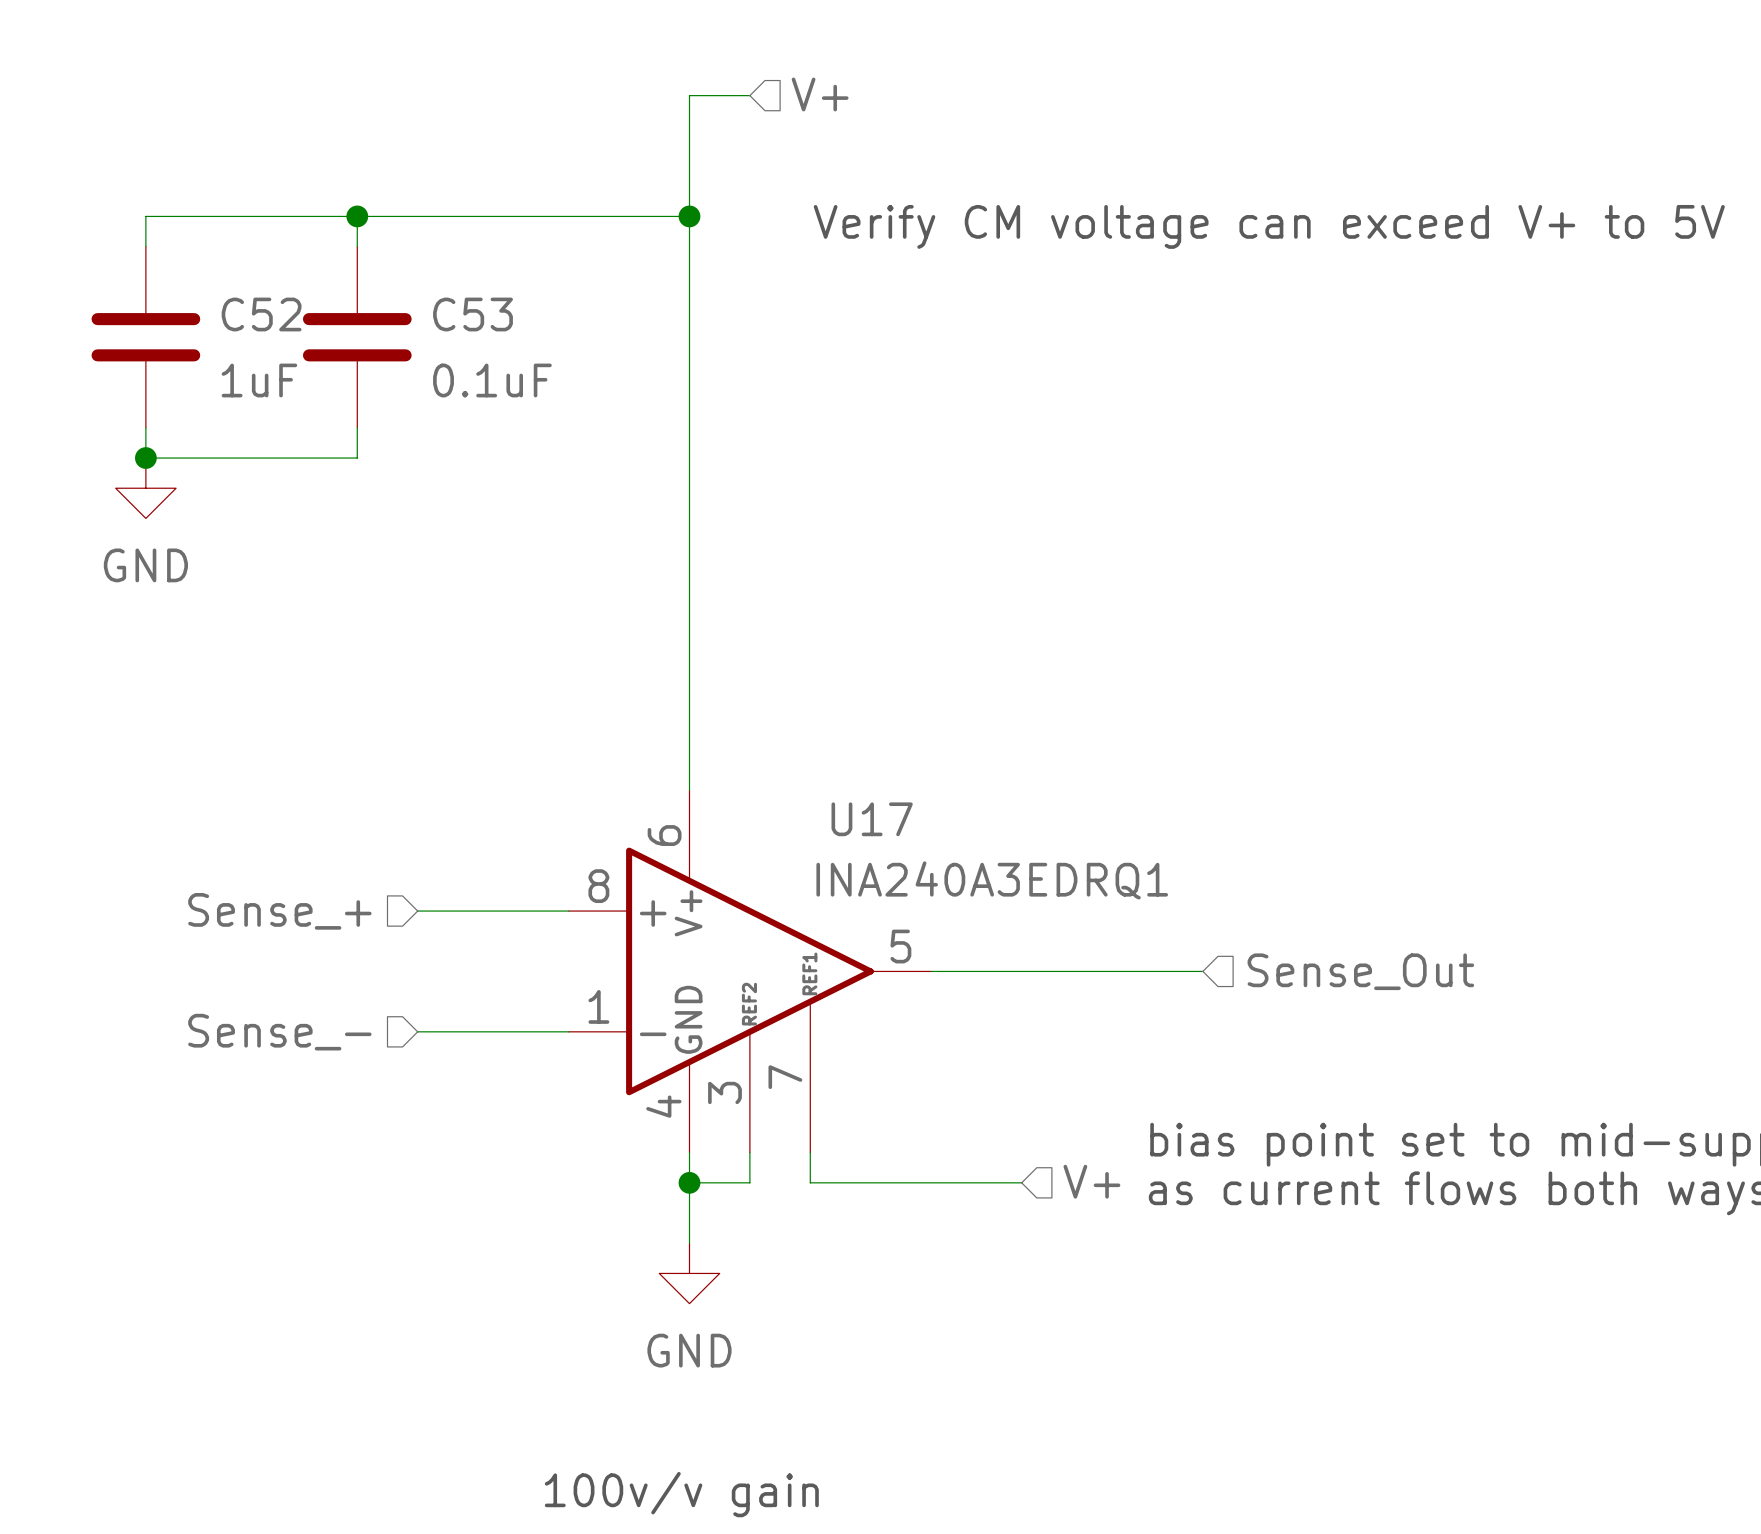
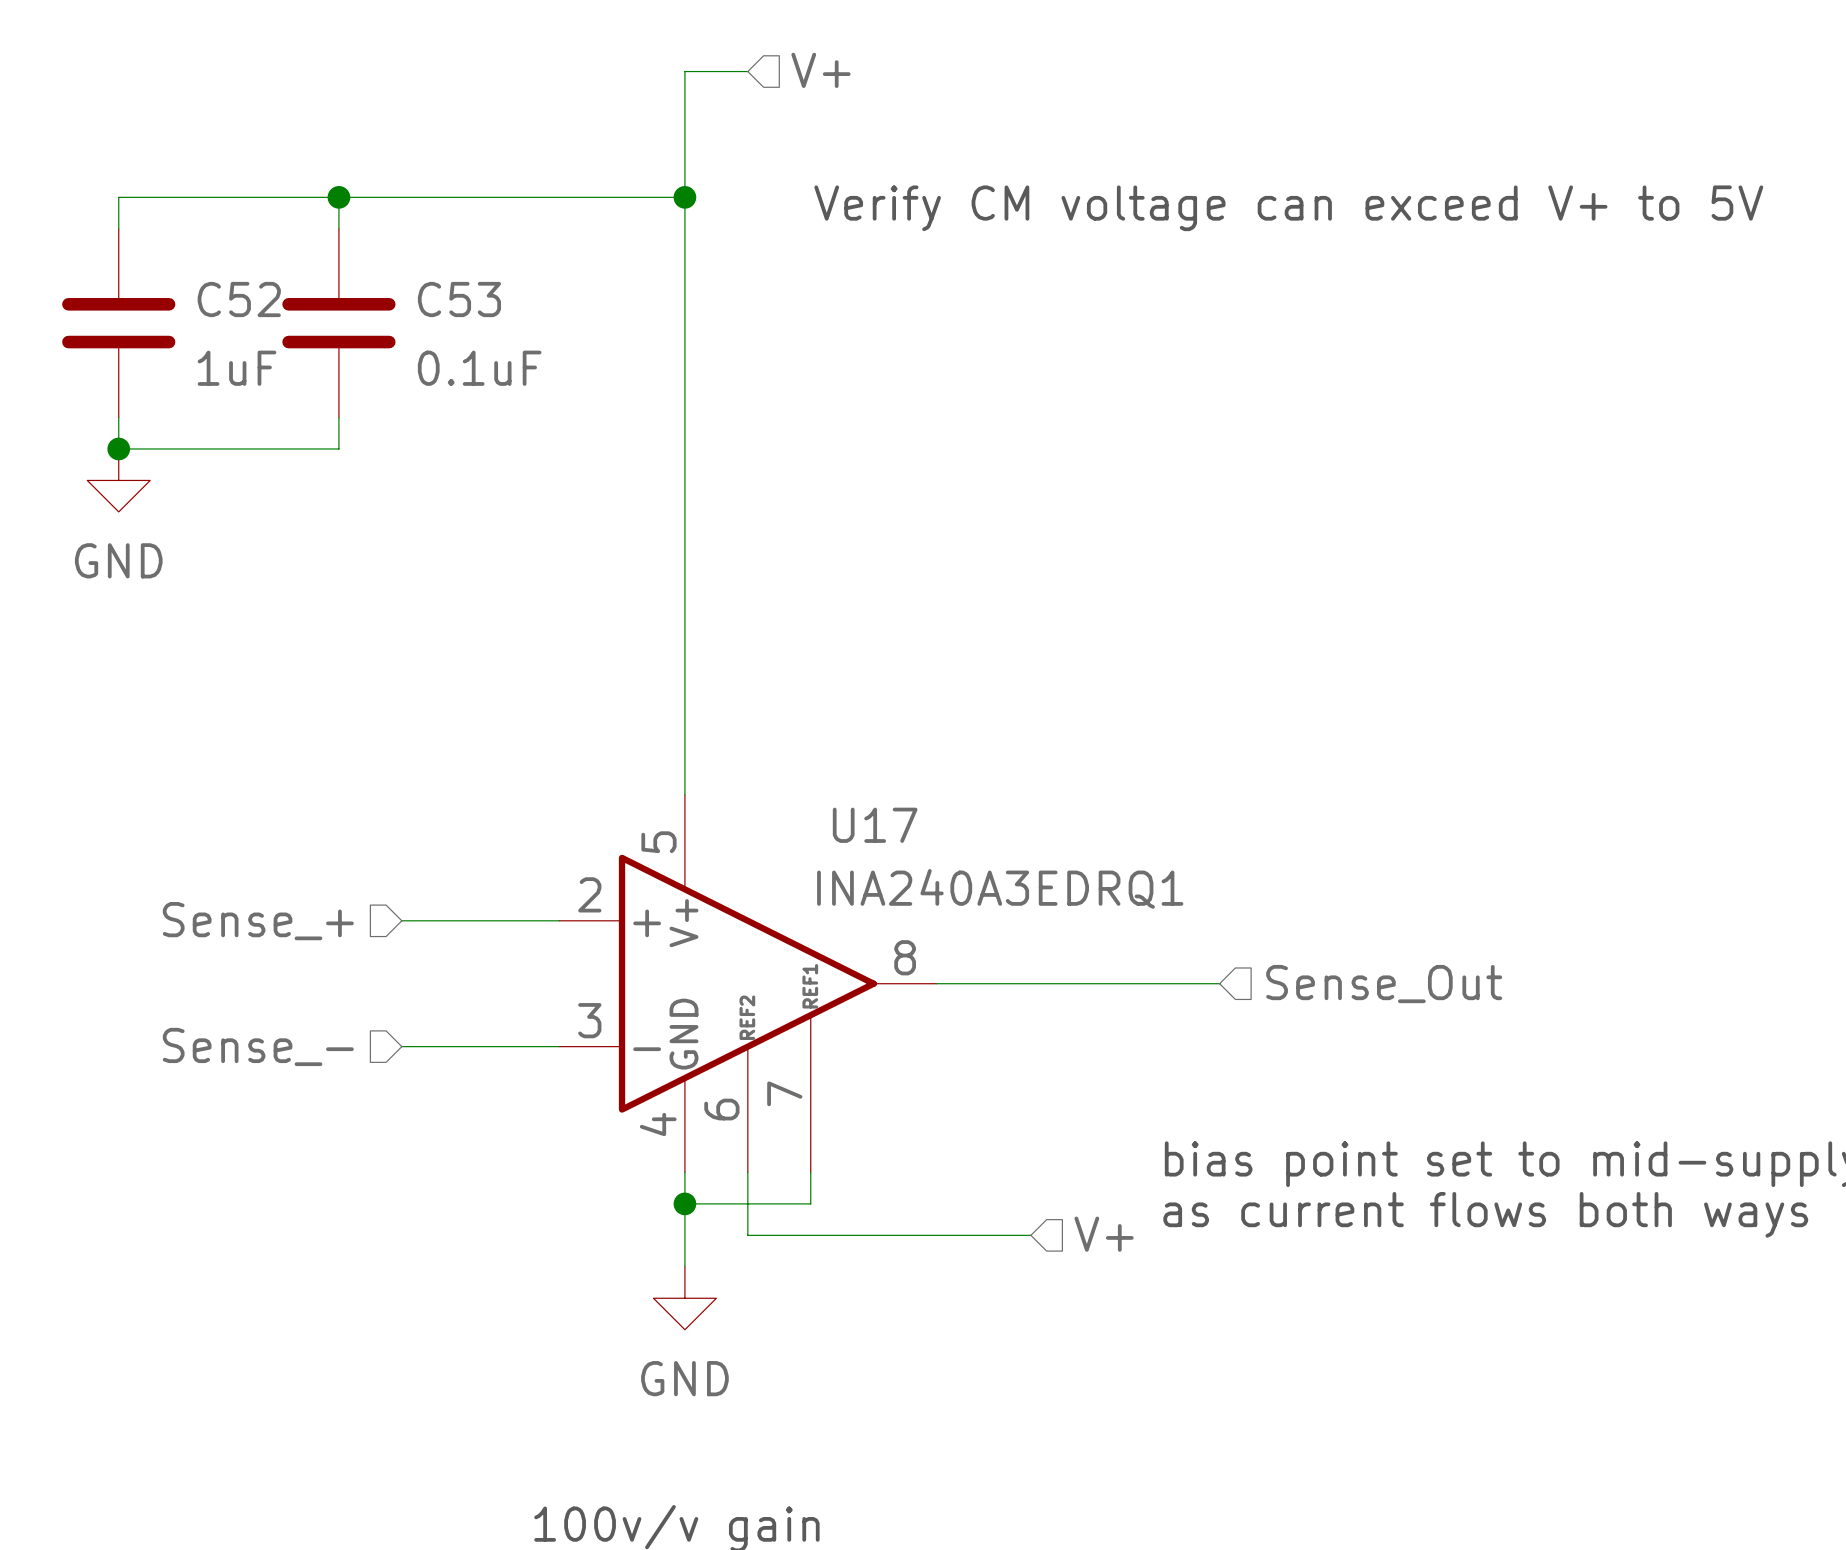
U17 pin number: 6 (664, 835) -> 5 (658, 842)
U17 pin number: 8 (598, 886) -> 2 (589, 894)
U17 pin number: 5 (900, 946) -> 8 (905, 957)
U17 pin number: 1 (598, 1006) -> 3 (589, 1020)
U17 pin number: 3 (724, 1092) -> 6 (721, 1109)
hierarchical label position: V+ (1091, 1181) -> V+ (1104, 1234)
wire: (810, 1182) (1021, 1182) -> (810, 1203) (747, 1203) (747, 1235) (1030, 1235)

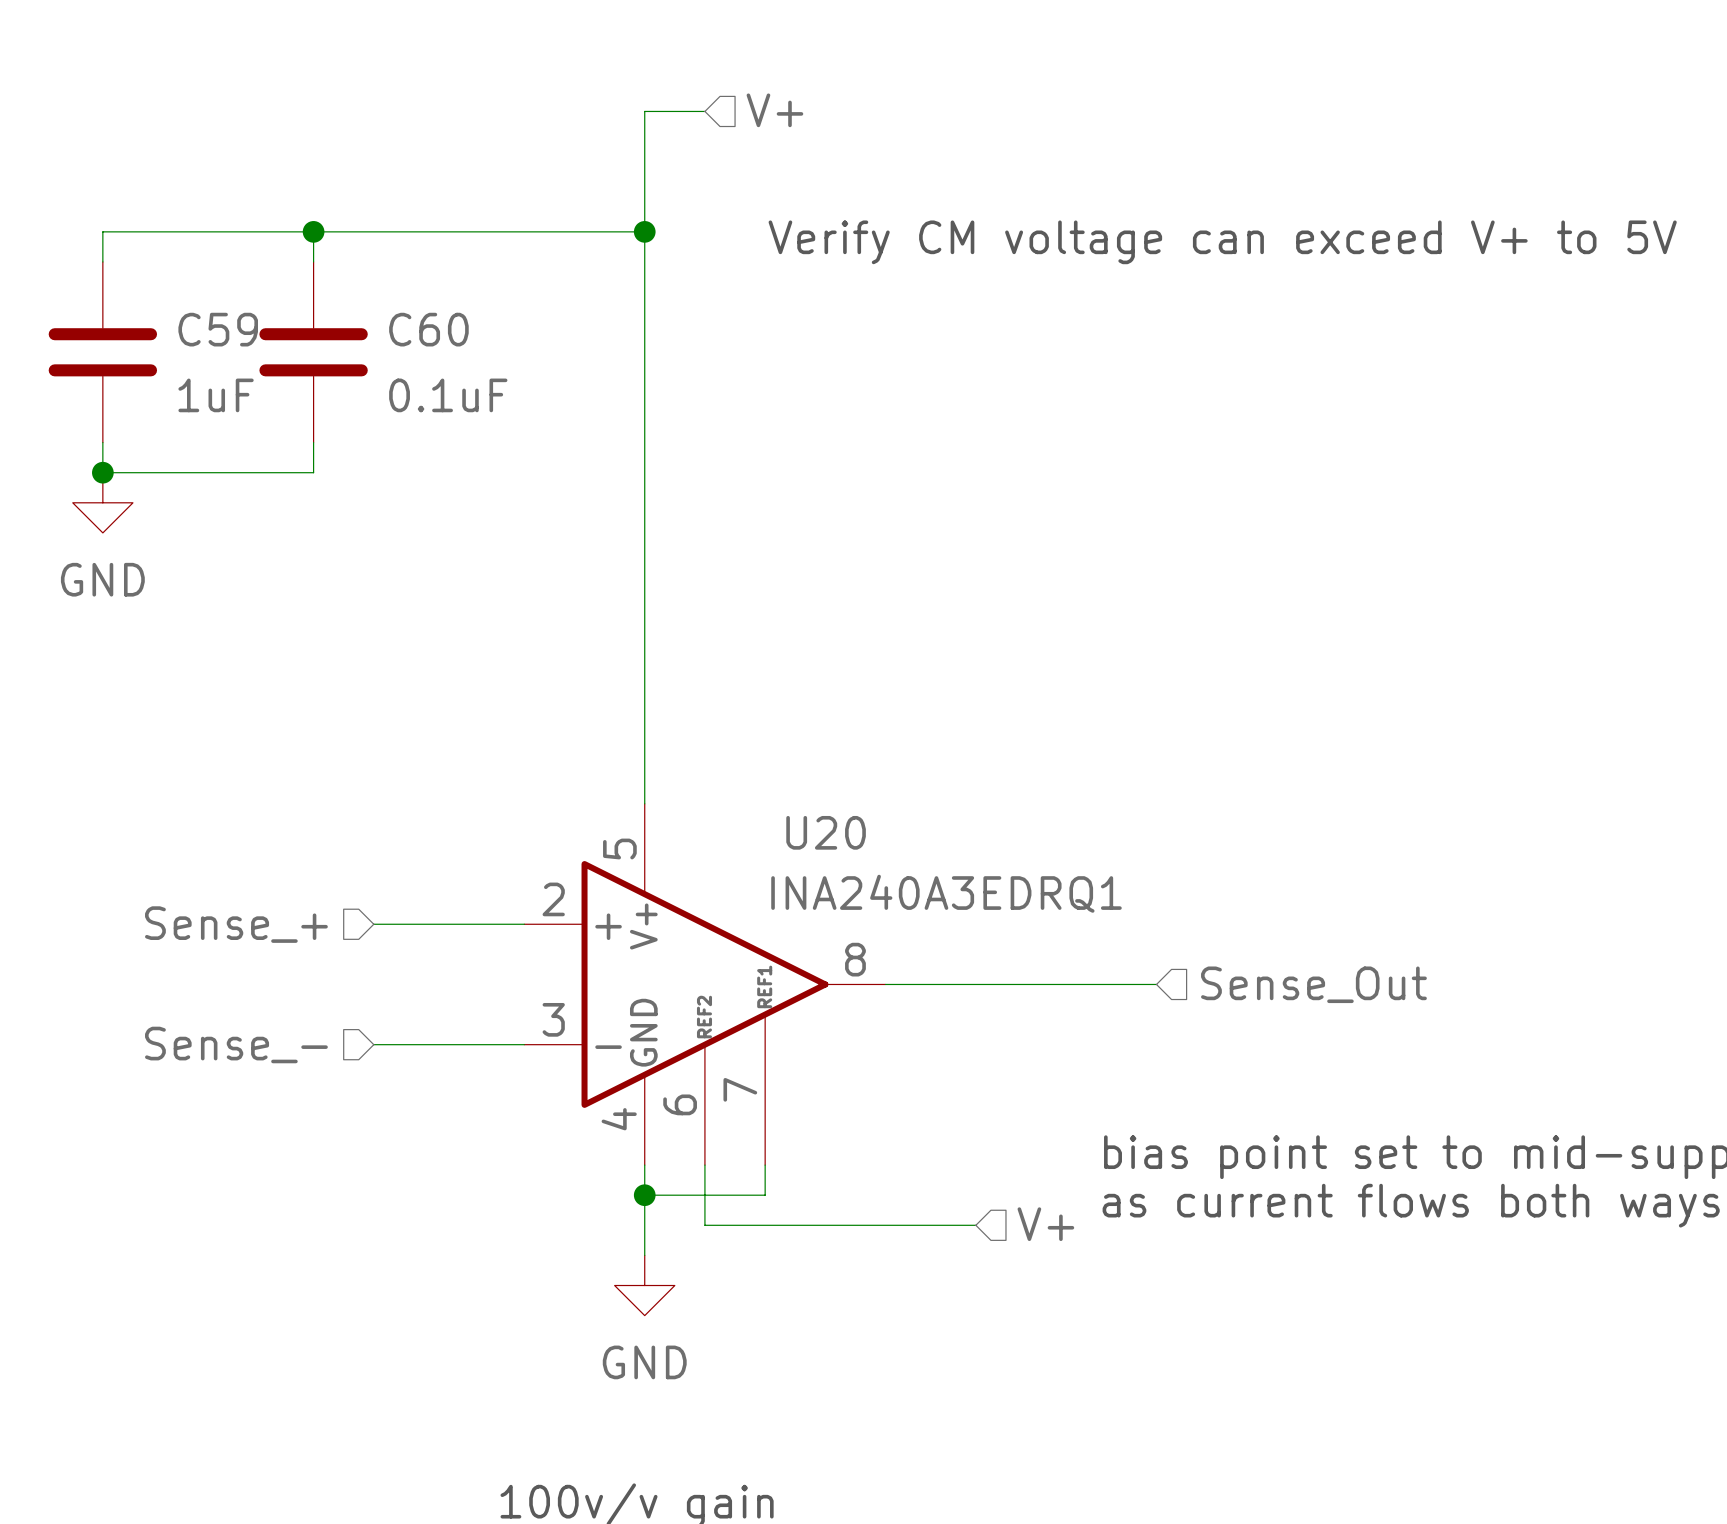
C52 name: C52 (239, 299) -> C59 (218, 329)
C53 name: C53 (459, 299) -> C60 (428, 329)
U17 name: U17 (875, 825) -> U20 (826, 832)

